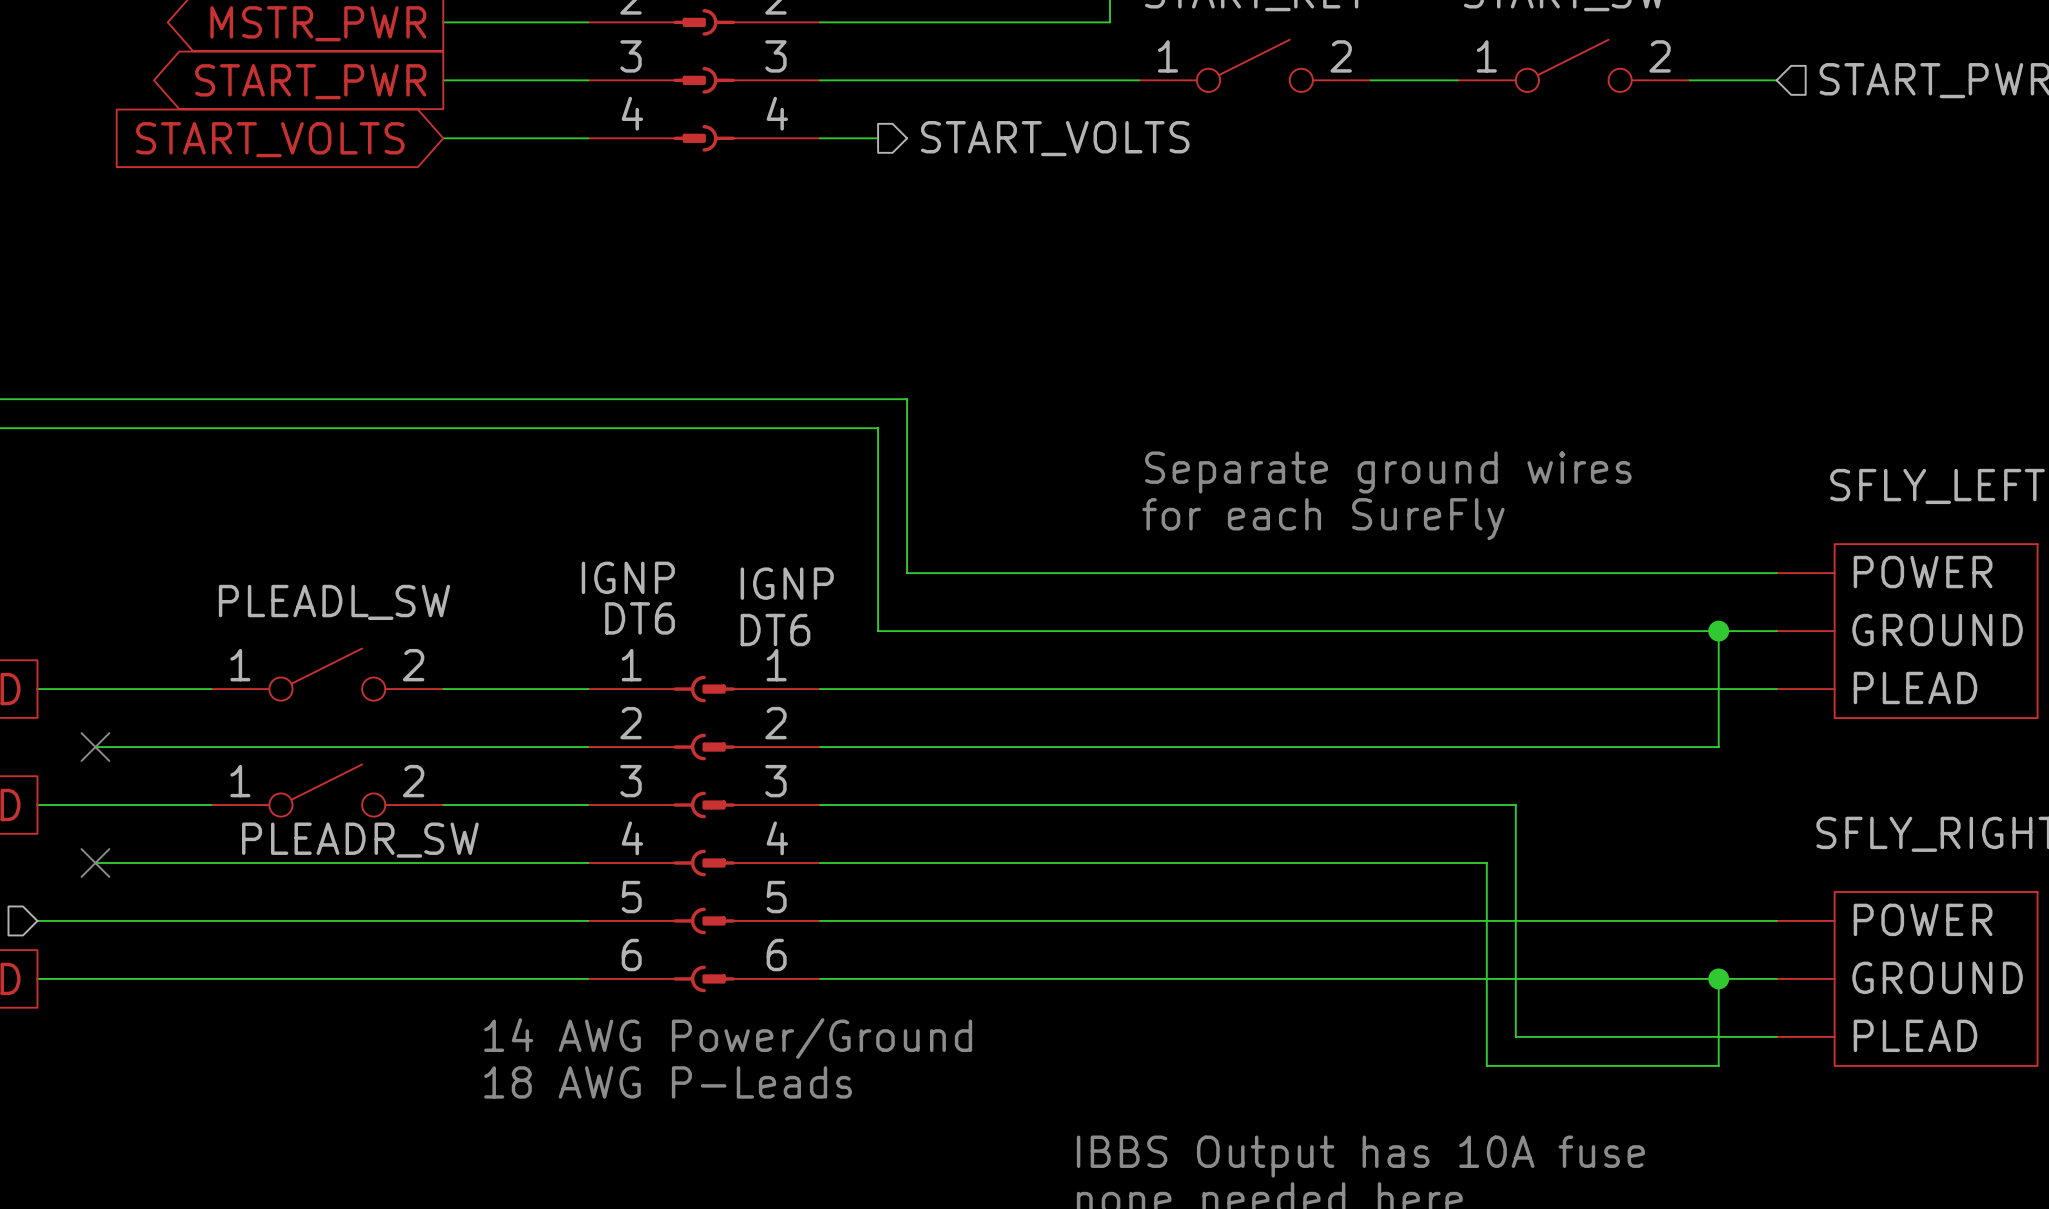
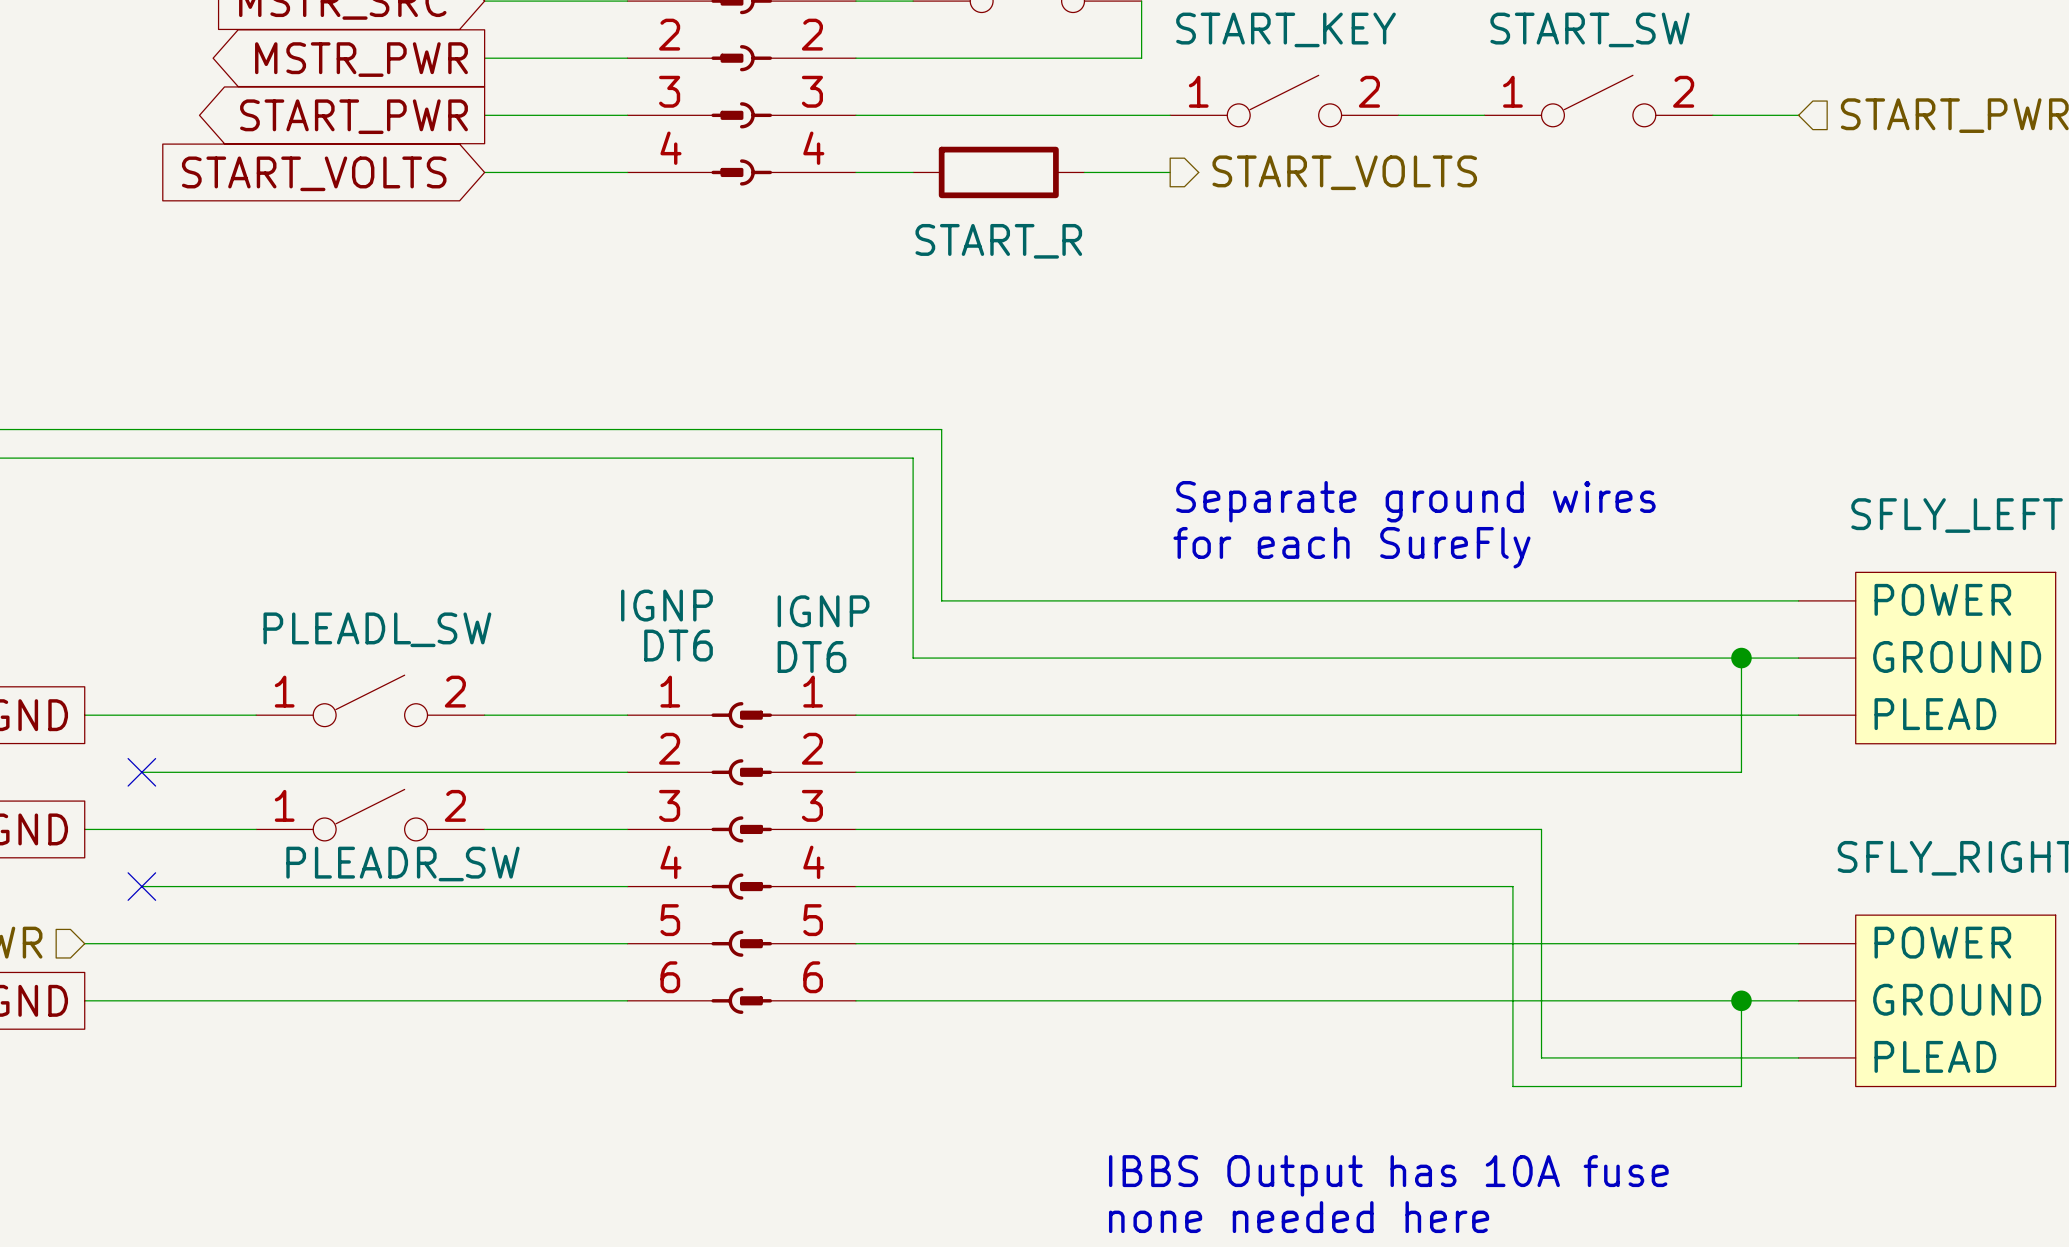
START_R: none -> (998, 172)
wire: none -> (1084, 172) (1170, 172)
hierarchical label position: START_VOLTS (1055, 138) -> START_VOLTS (1344, 172)
text: 14 AWG Power/Ground (728, 1038) -> none
text: 18 AWG P-Leads (668, 1082) -> none

